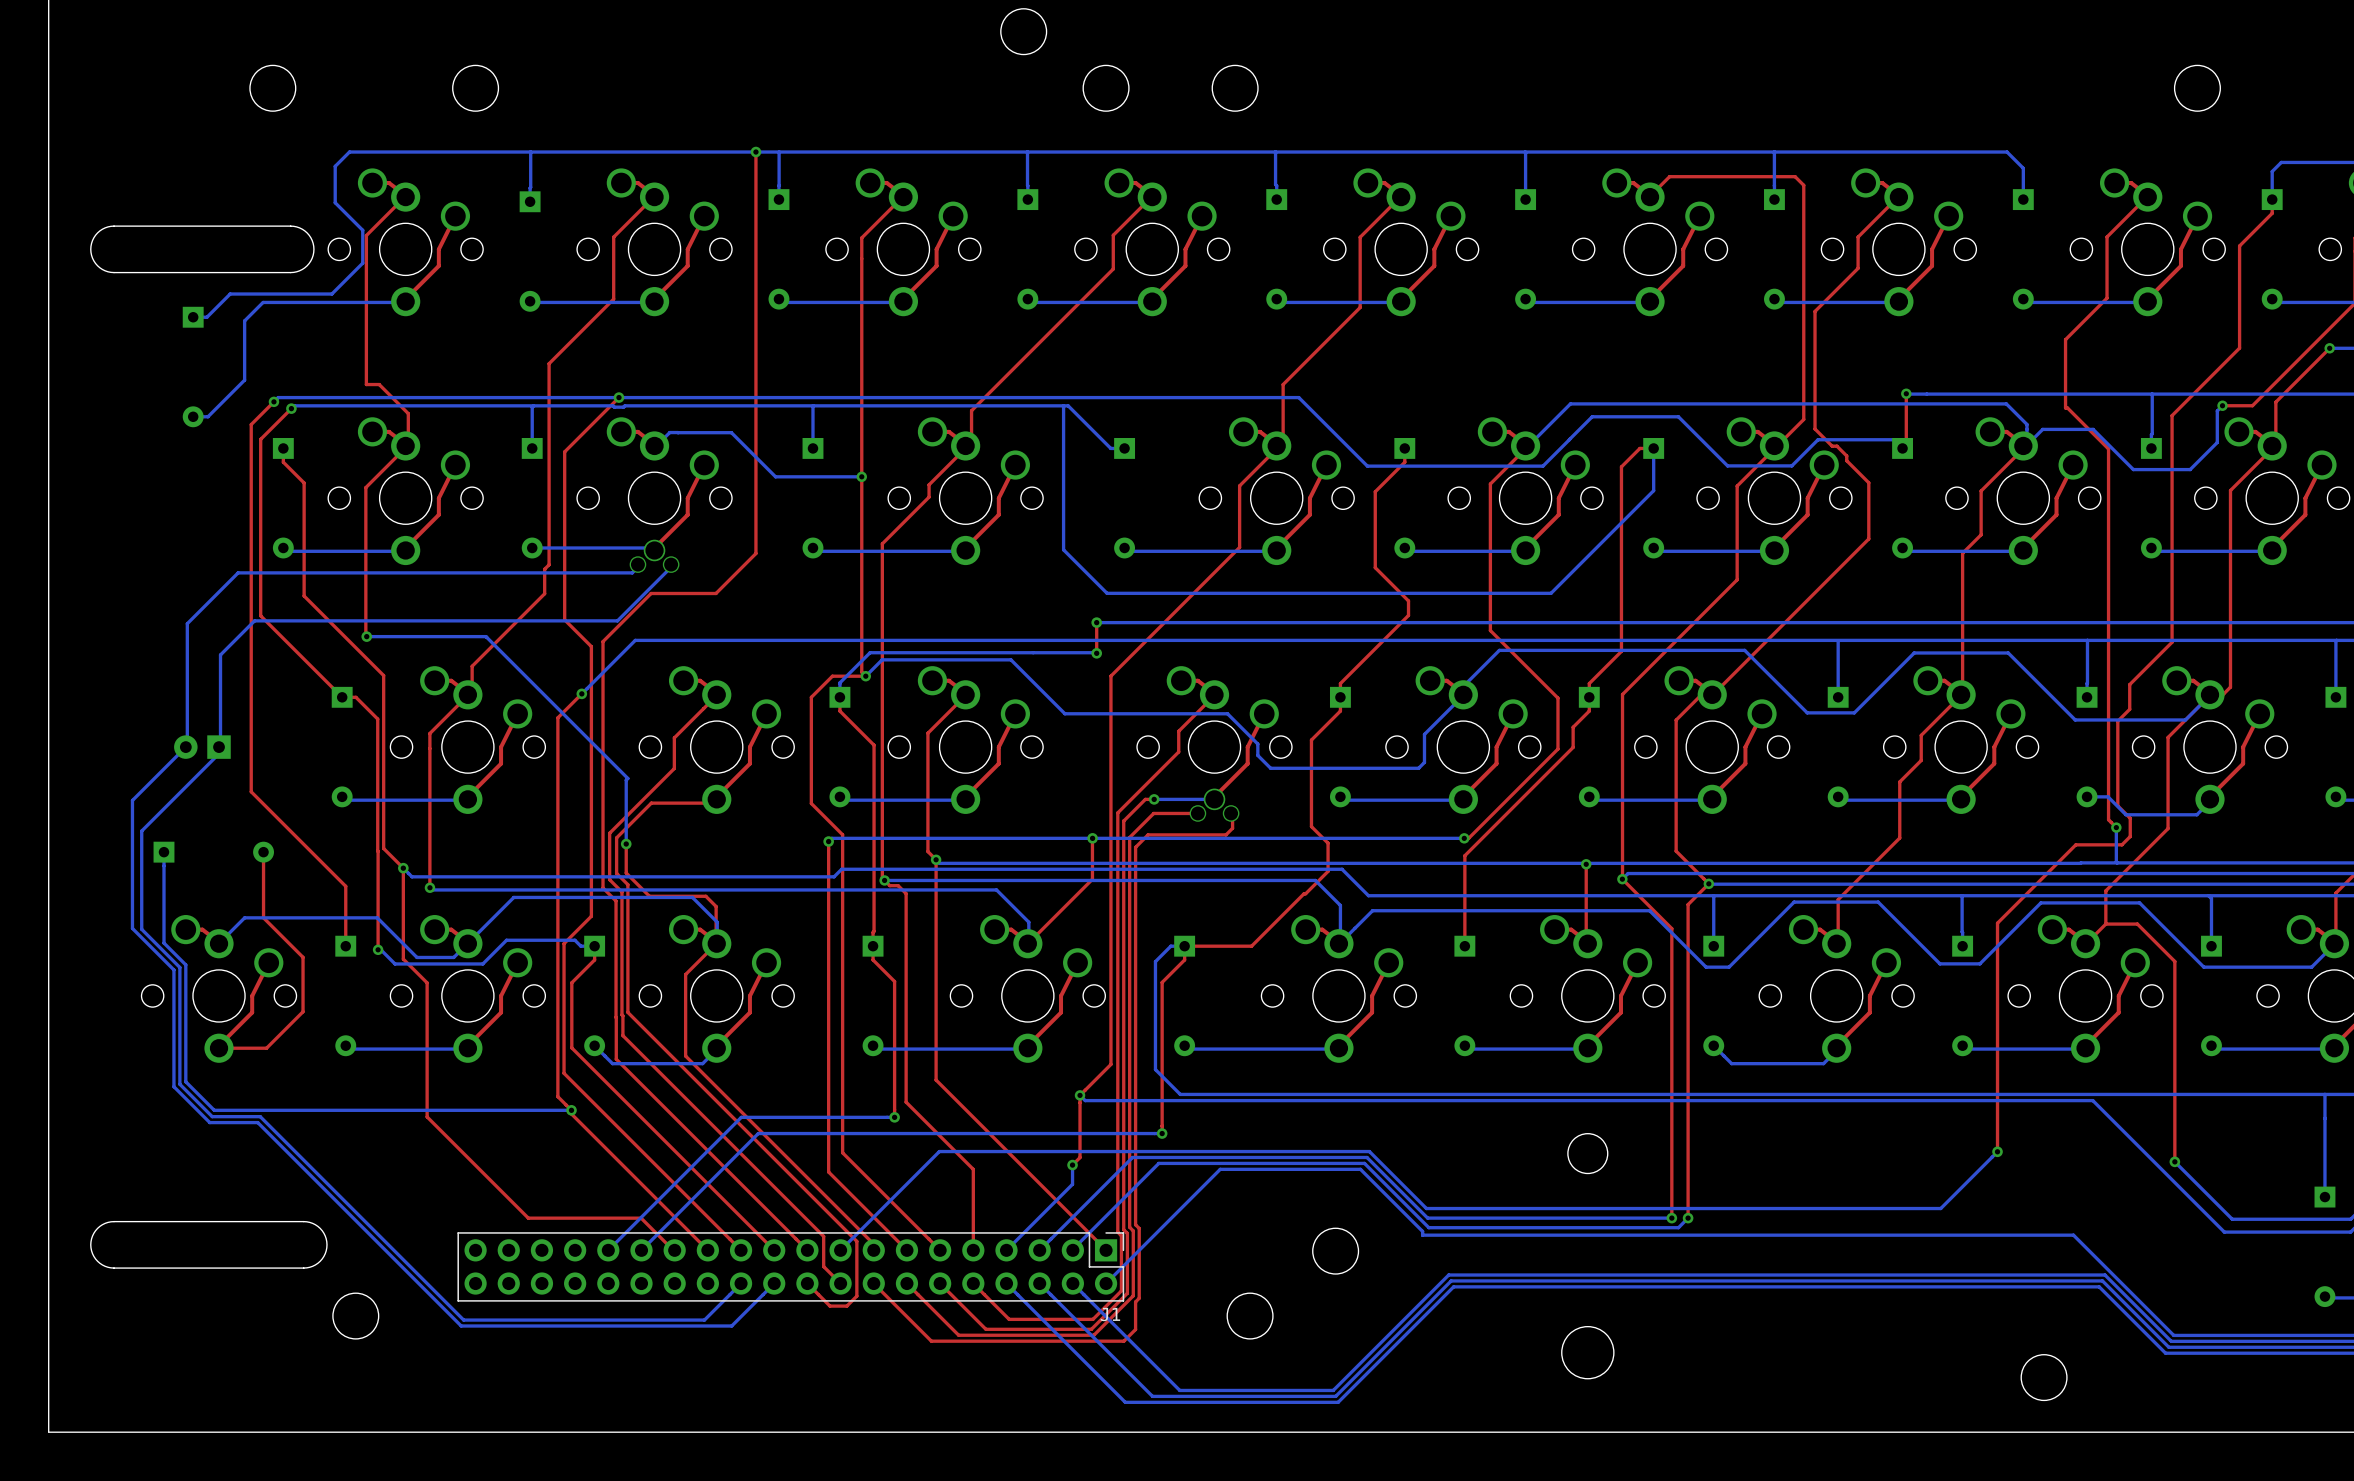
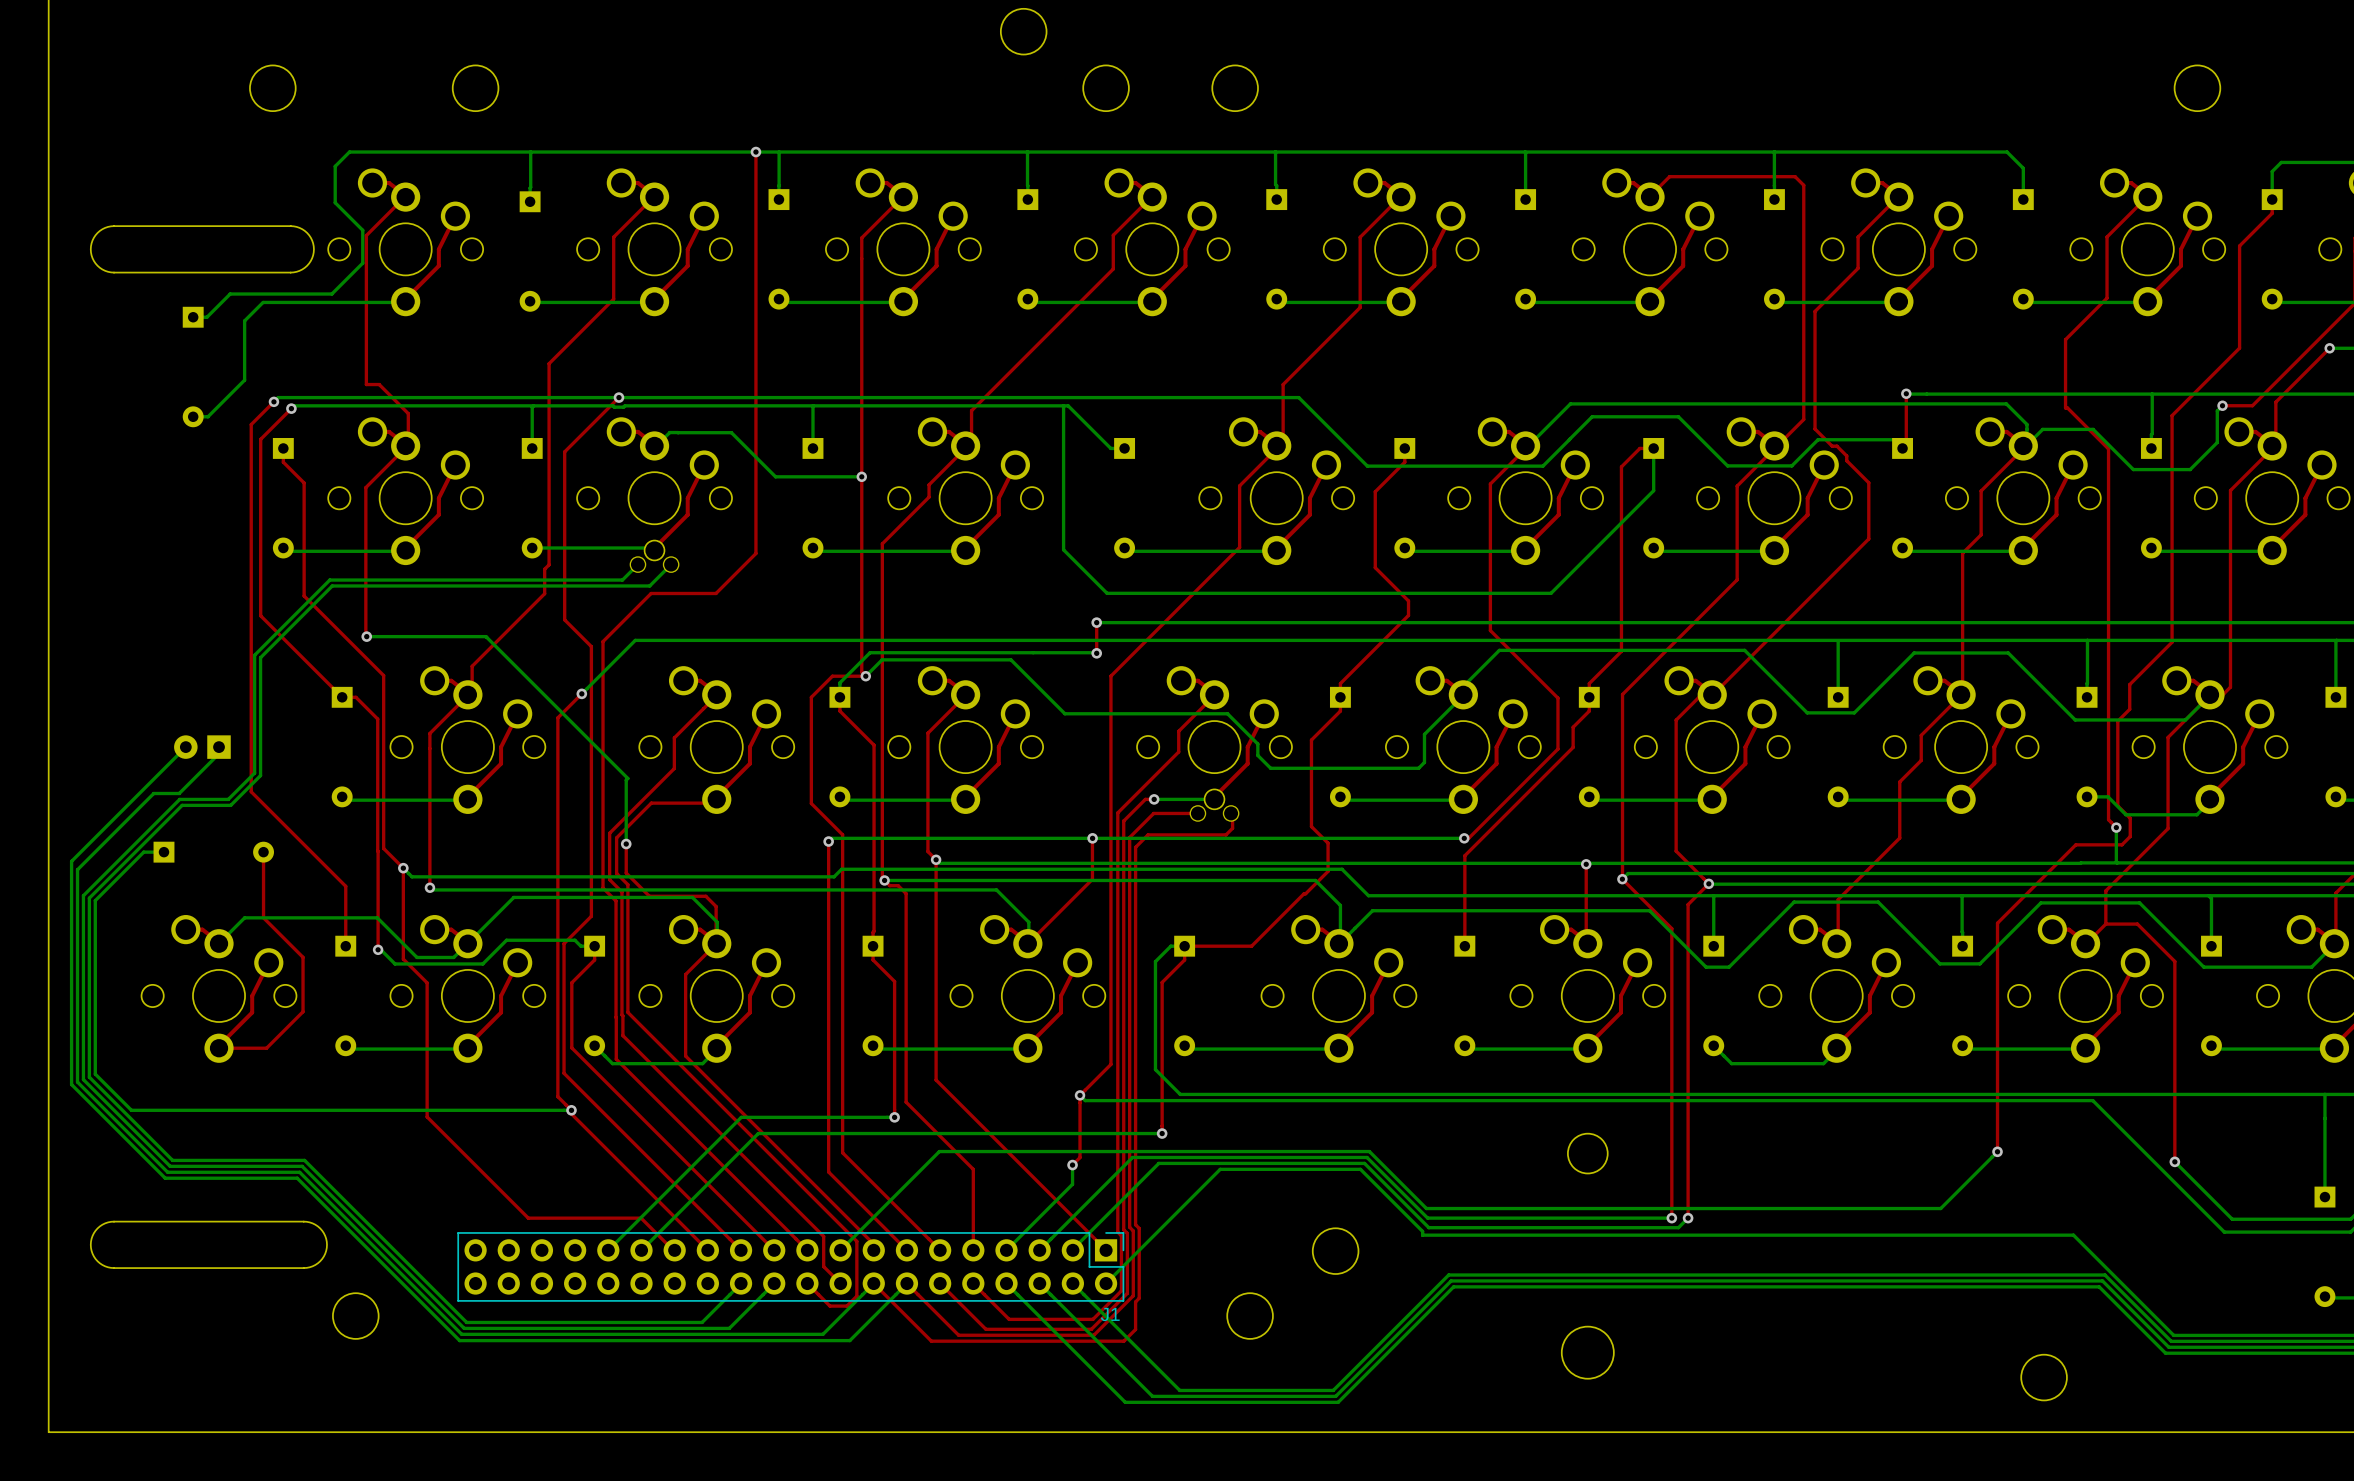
bottom track: none -> (637, 564) (622, 580) (329, 580) (254, 655) (254, 773) (228, 799) (179, 799) (83, 895) (83, 1079) (170, 1166) (302, 1166) (464, 1328) (729, 1328) (731, 1326)
bottom track: (640, 564) (632, 572) (238, 572) (187, 623) (187, 747) -> none
bottom track: none -> (671, 564) (649, 585) (332, 585) (260, 657) (260, 775) (230, 805) (182, 805) (89, 898) (89, 1077) (172, 1160) (304, 1160) (466, 1322) (702, 1322) (704, 1320)
bottom track: (673, 564) (617, 620) (254, 620) (220, 654) (220, 752) -> none
bottom track: (179, 793) (141, 831) (141, 929) (179, 967) (179, 1084) (212, 1116) (260, 1116) (463, 1320) (704, 1320) -> (179, 793) (153, 793) (77, 869) (77, 1082) (167, 1172) (299, 1172) (461, 1334) (822, 1334) (873, 1283)
bottom track: (132, 800) (132, 928) (173, 969) (173, 1086) (209, 1122) (257, 1122) (461, 1326) (731, 1326) -> (132, 800) (71, 861) (71, 1084) (165, 1178) (297, 1178) (459, 1340) (849, 1340) (906, 1283)
bottom track: (163, 852) (163, 943) (185, 964) (185, 1081) (214, 1110) -> (163, 852) (143, 852) (95, 900) (95, 1074) (131, 1110) (214, 1110)

